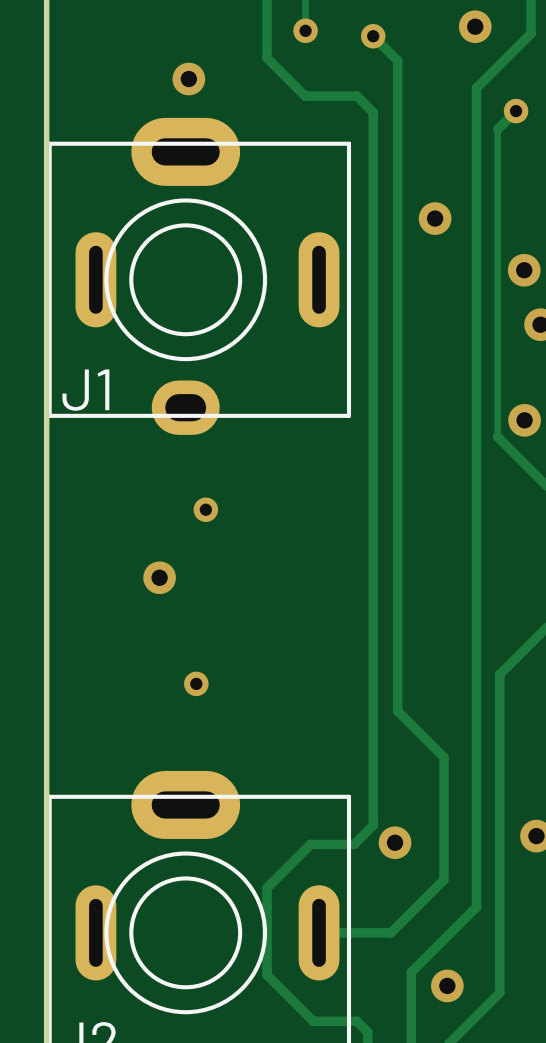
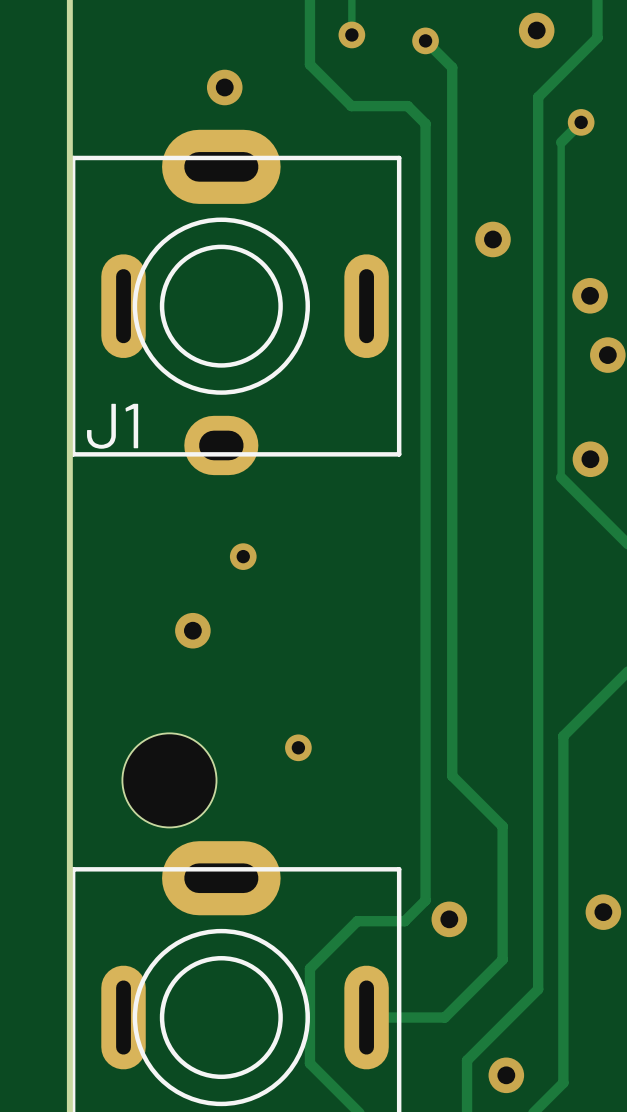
via position: (196, 683) -> (298, 747)
part: none -> (169, 780)

